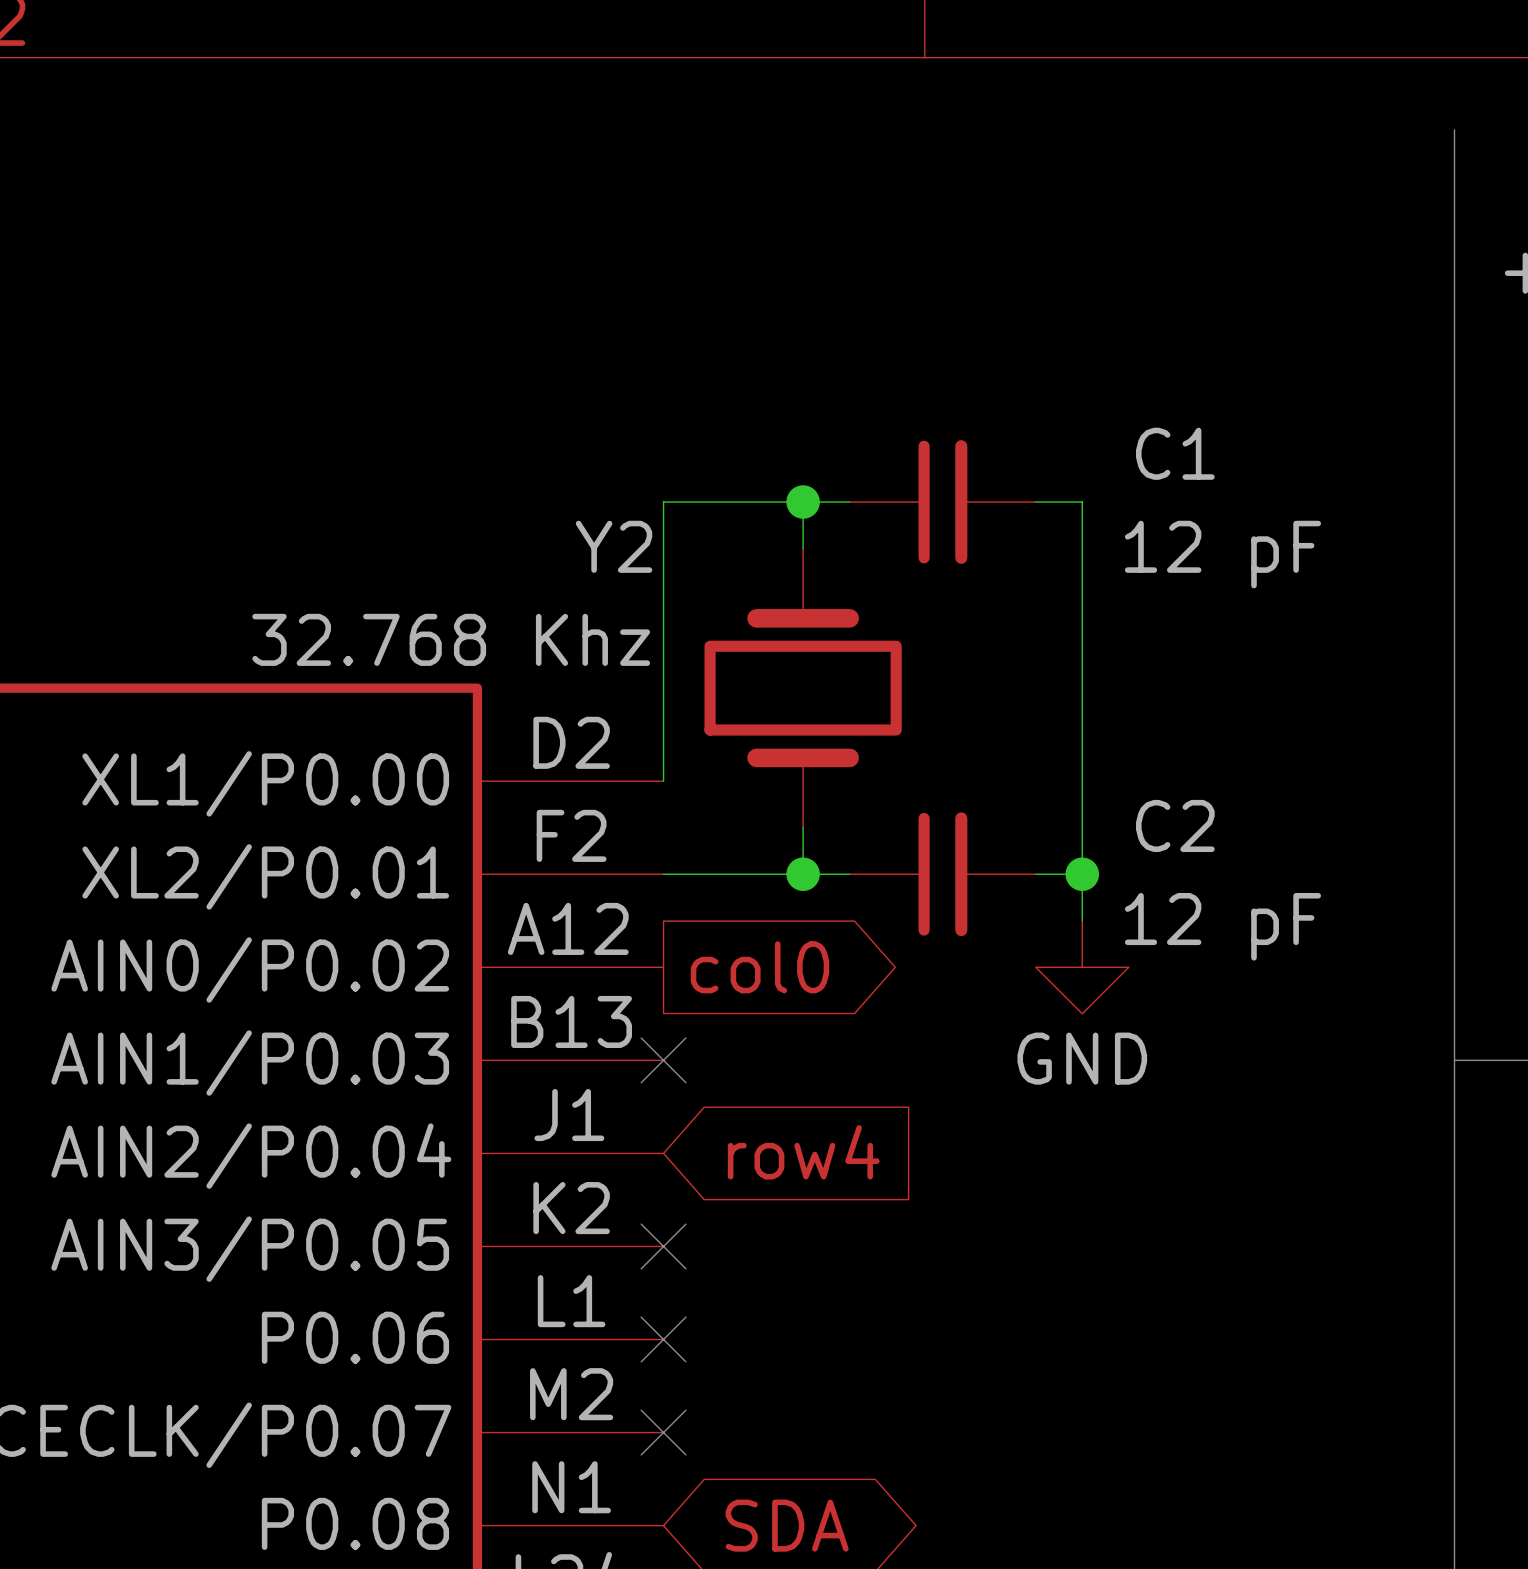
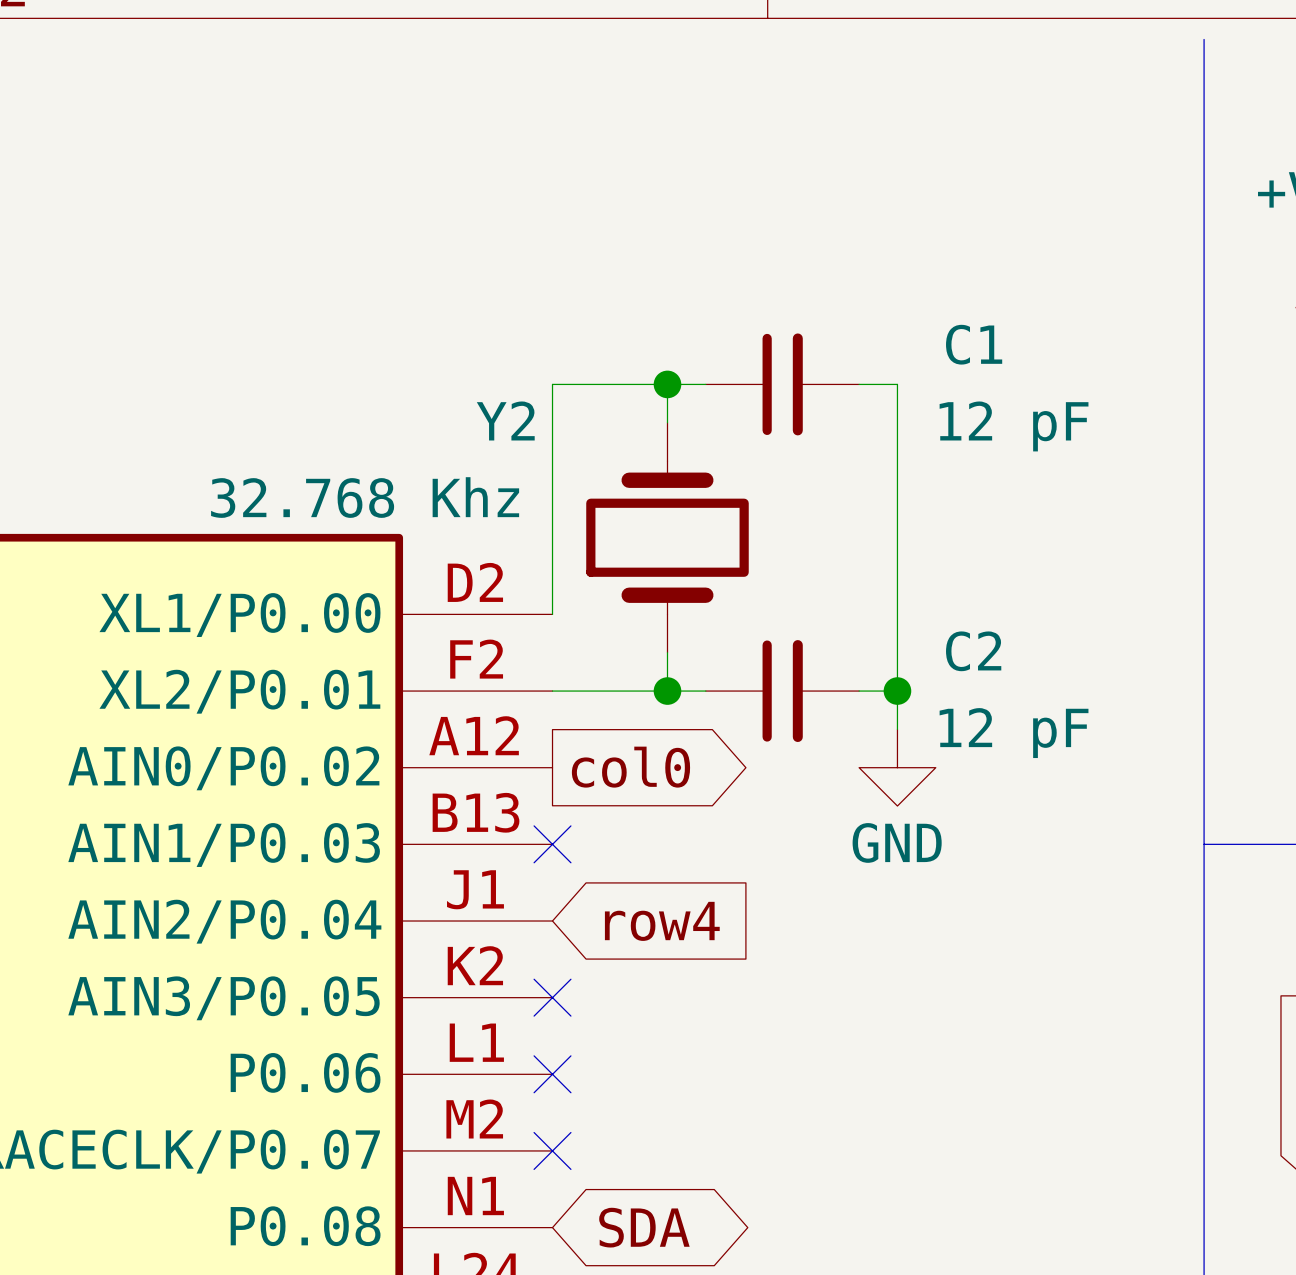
line: none -> (1204, 39) (1204, 77)

